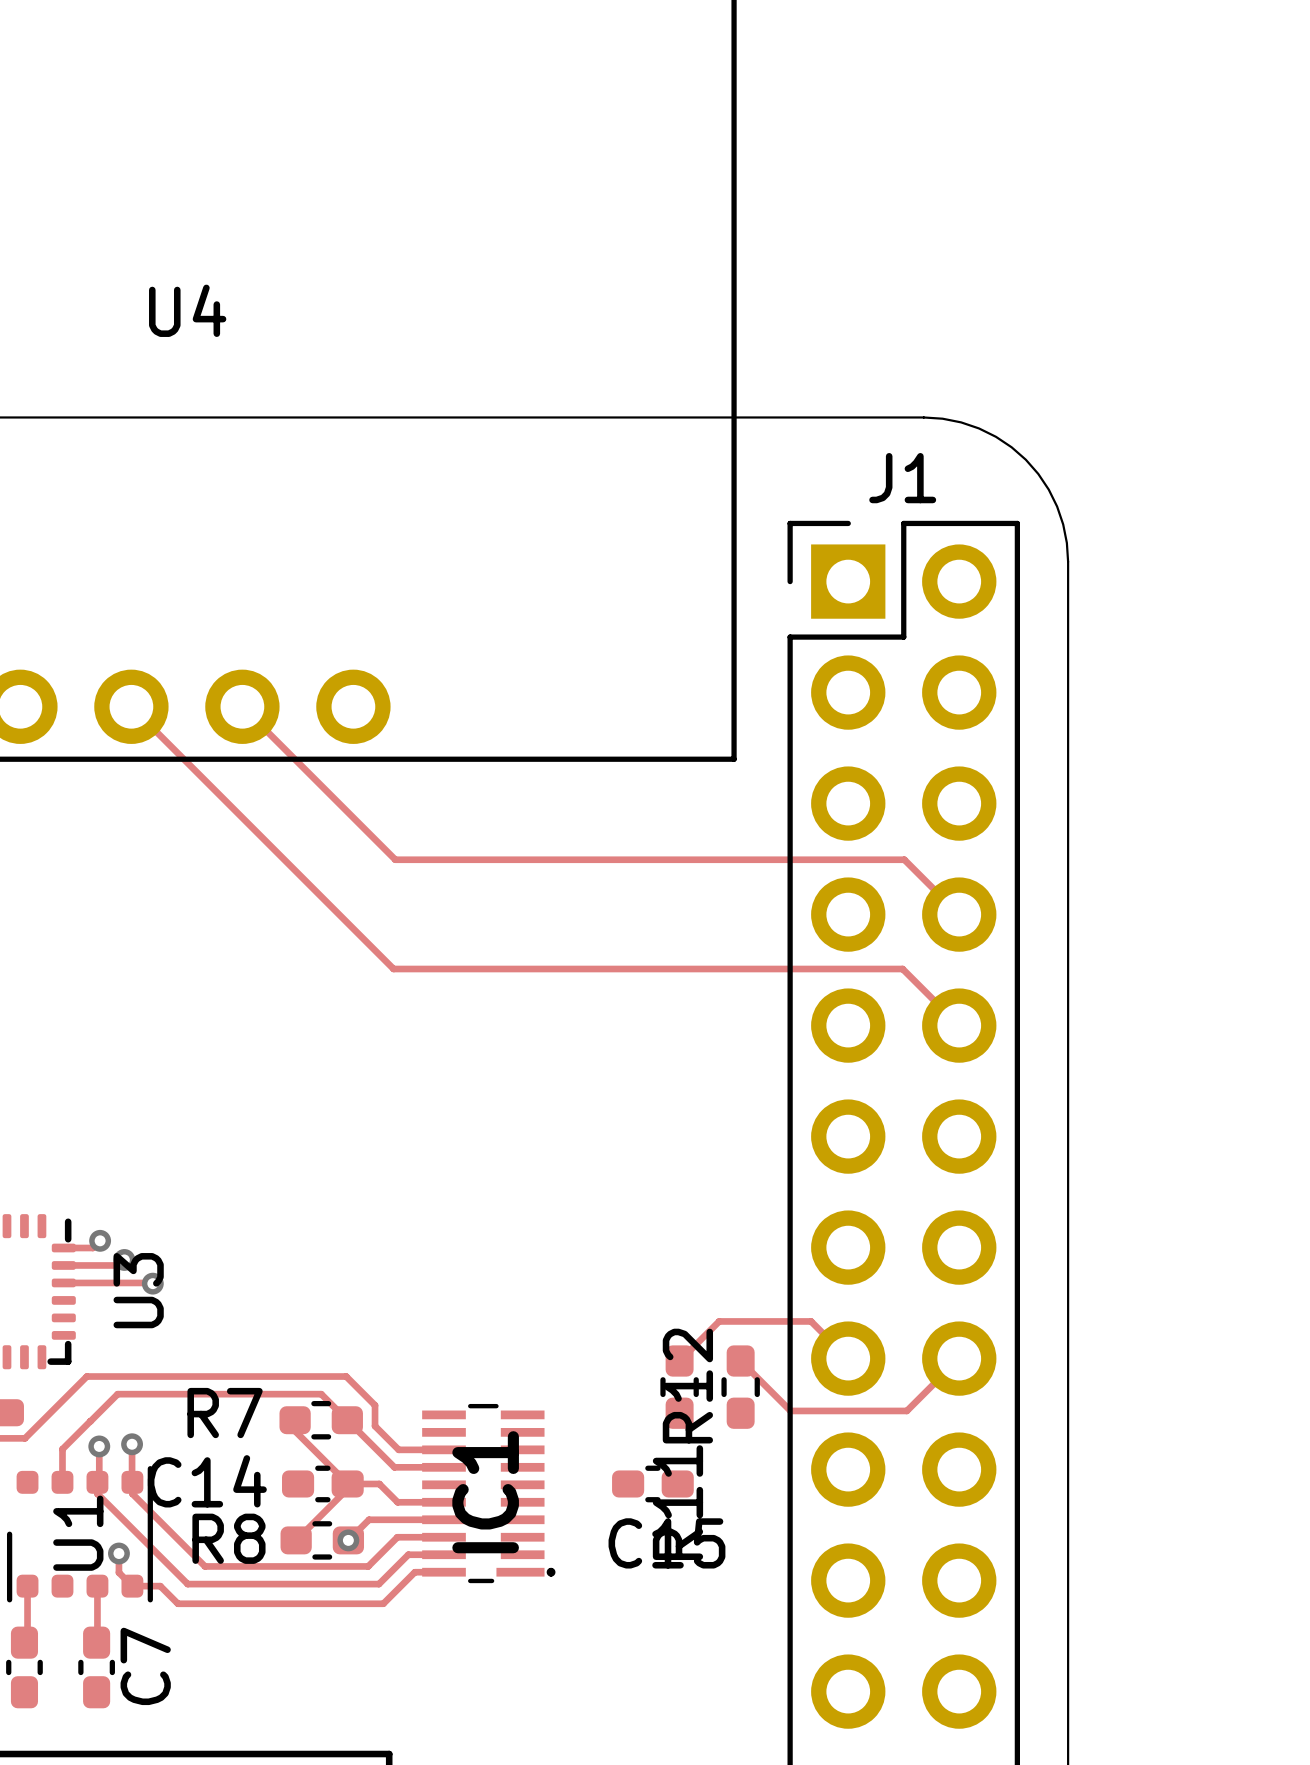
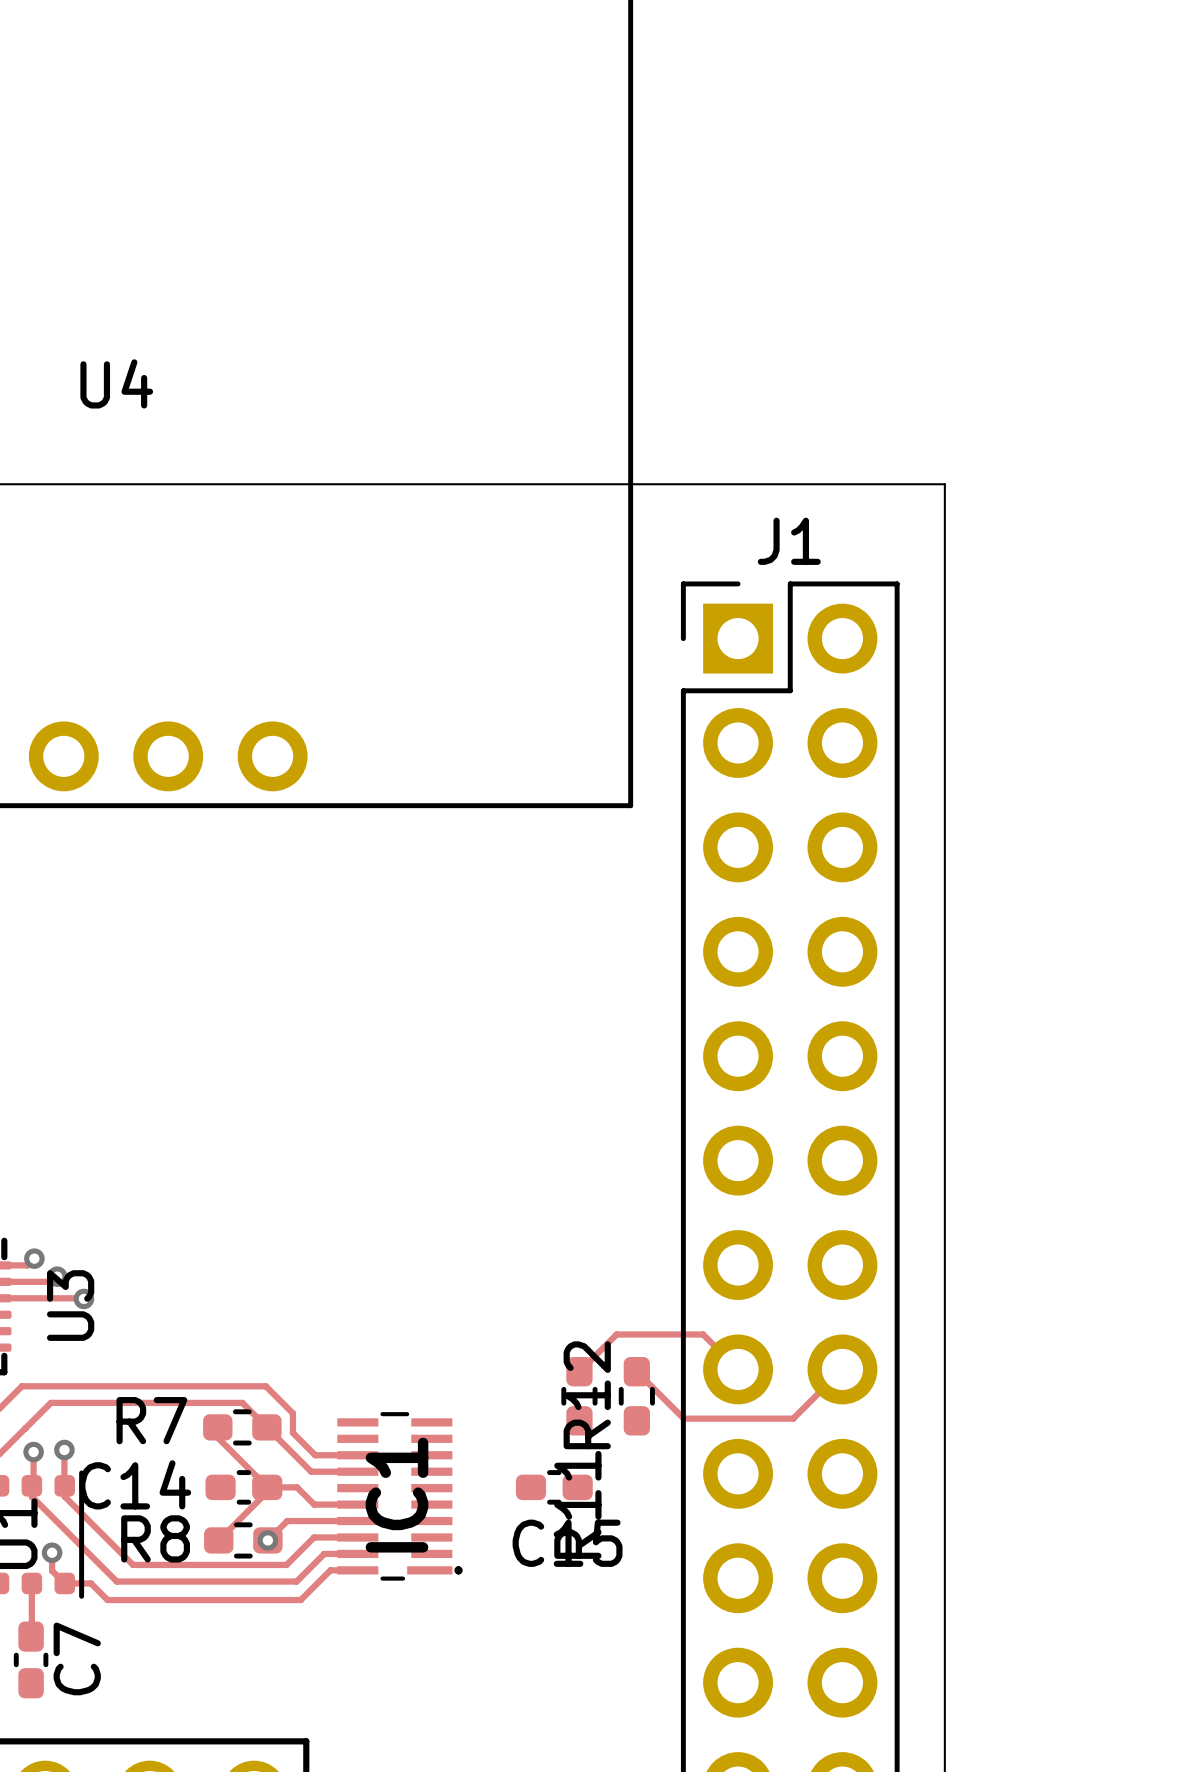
board edge: (923, 417) (942, 418) (979, 428) (995, 436) (1025, 459) (1048, 489) (1057, 506) (1066, 542) (1068, 561) -> (809, 484) (944, 484) (944, 619)
track: (131, 706) (393, 969) (902, 969) (959, 1025) -> none
track: (242, 706) (395, 859) (904, 859) (959, 914) -> none

